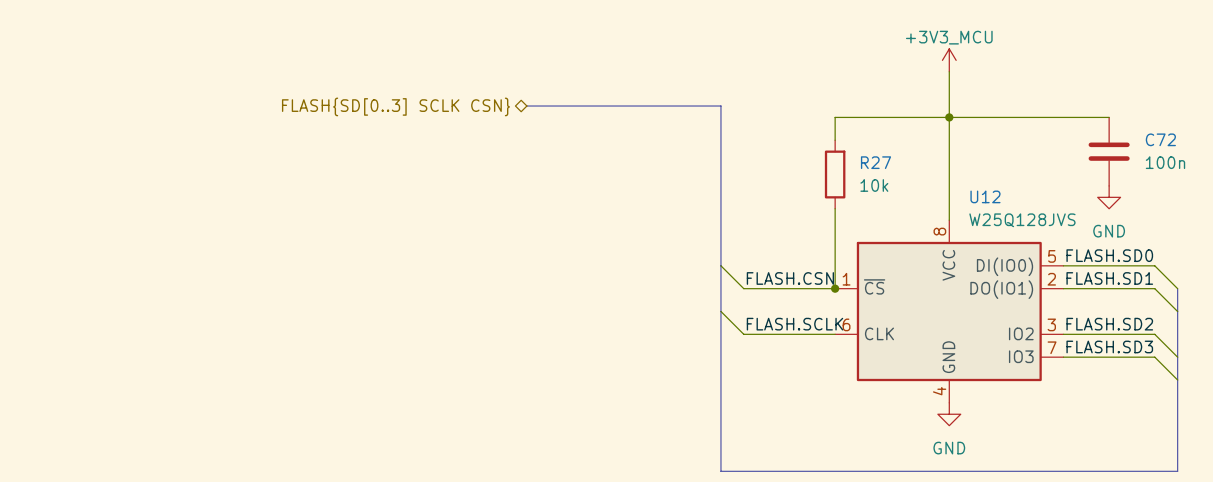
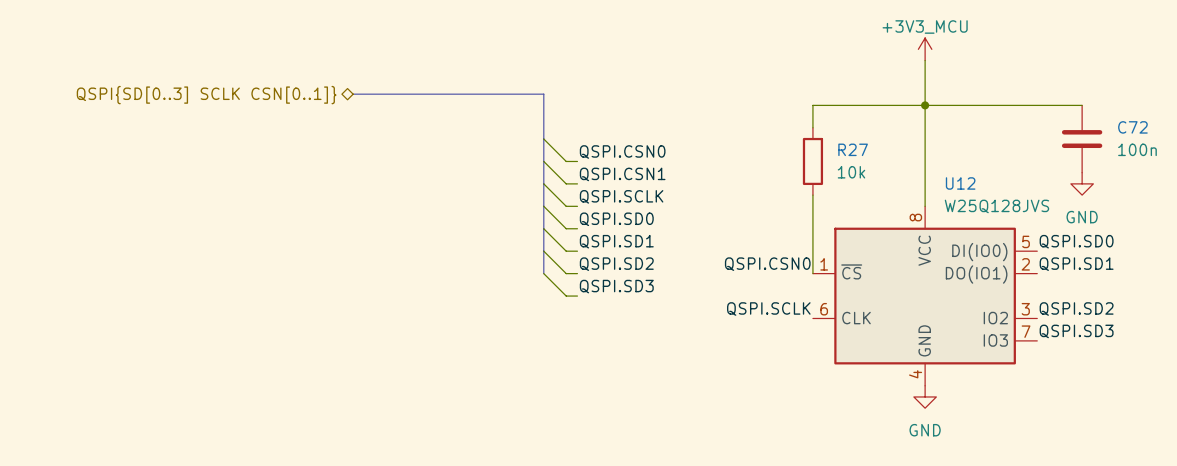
bus: none -> (353, 94) (510, 94)
hierarchical label: FLASH{SD[0..3] SCLK CSN} (395, 106) -> QSPI{SD[0..3] SCLK CSN[0..1]} (206, 95)
bus: (561, 106) (720, 106) (720, 471) (1177, 471) (1177, 288) -> (543, 94) (543, 273)
wire: none -> (543, 139) (566, 161) (577, 161)
label: none -> QSPI.CSN0 (622, 151)
wire: none -> (543, 161) (566, 183) (577, 183)
label: none -> QSPI.CSN1 (622, 174)
wire: none -> (543, 183) (566, 206) (577, 206)
label: none -> QSPI.SCLK (621, 196)
wire: none -> (543, 206) (566, 228) (577, 228)
label: none -> QSPI.SD0 (616, 219)
wire: none -> (543, 228) (566, 251) (577, 251)
label: FLASH.SD0 (1109, 255) -> QSPI.SD0 (1076, 241)
label: none -> QSPI.SD1 (616, 241)
wire: none -> (543, 251) (566, 273) (577, 273)
wire: (720, 265) (743, 288) (835, 288) -> none
wire: (1063, 265) (1154, 265) (1177, 288) -> none
label: FLASH.CSN (790, 278) -> none
label: FLASH.SD1 (1109, 278) -> QSPI.SD1 (1076, 264)
label: none -> QSPI.SD2 (616, 264)
label: none -> QSPI.CSN0 (767, 264)
wire: none -> (543, 273) (566, 296) (577, 296)
junction: (835, 288) -> none
wire: (1063, 288) (1154, 288) (1177, 311) -> none
label: none -> QSPI.SD3 (616, 286)
wire: (720, 311) (743, 334) (835, 334) -> none
label: FLASH.SCLK (794, 324) -> QSPI.SCLK (768, 309)
label: FLASH.SD2 (1109, 324) -> QSPI.SD2 (1076, 309)
wire: (1063, 334) (1154, 334) (1177, 357) -> none
label: FLASH.SD3 (1109, 346) -> QSPI.SD3 (1076, 331)
wire: (1063, 357) (1154, 357) (1177, 380) -> none

